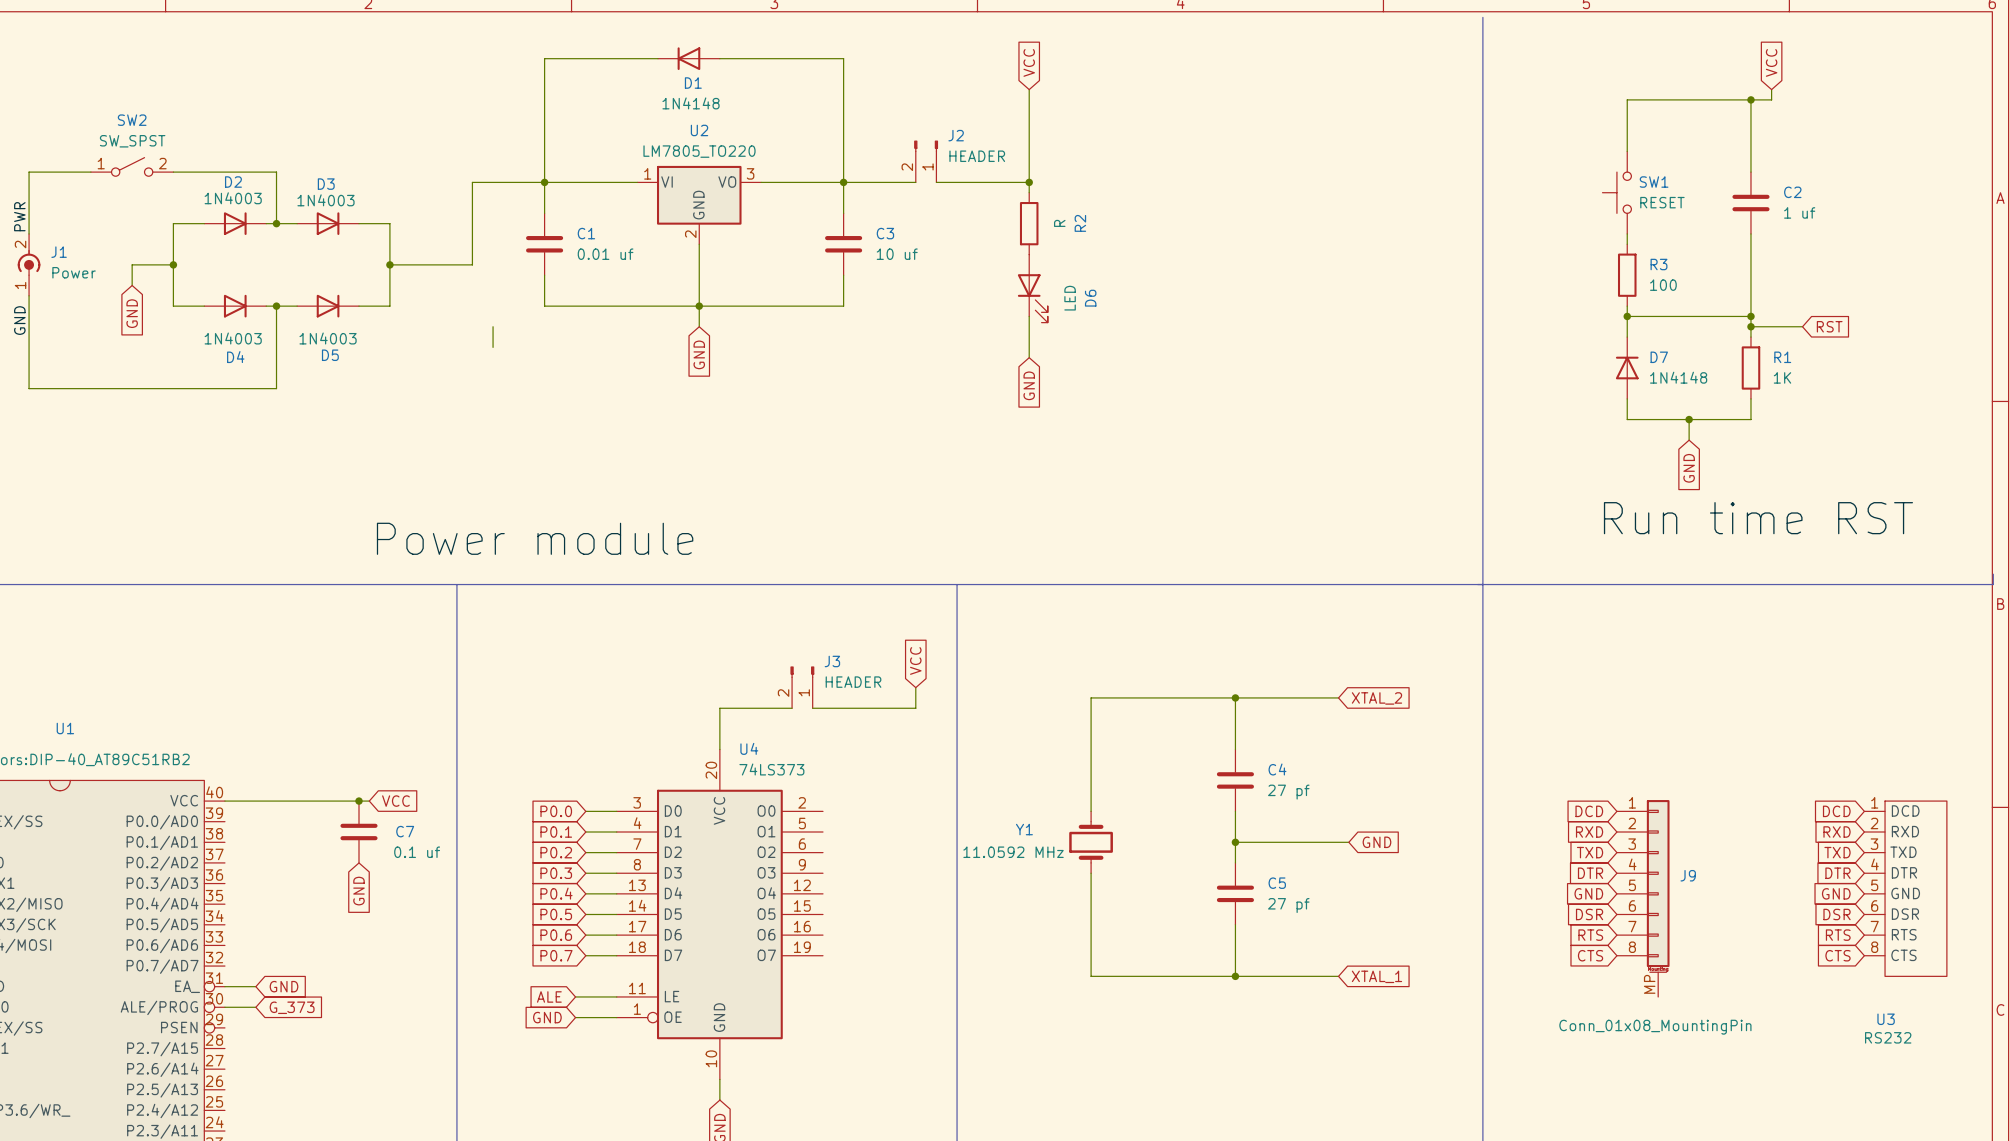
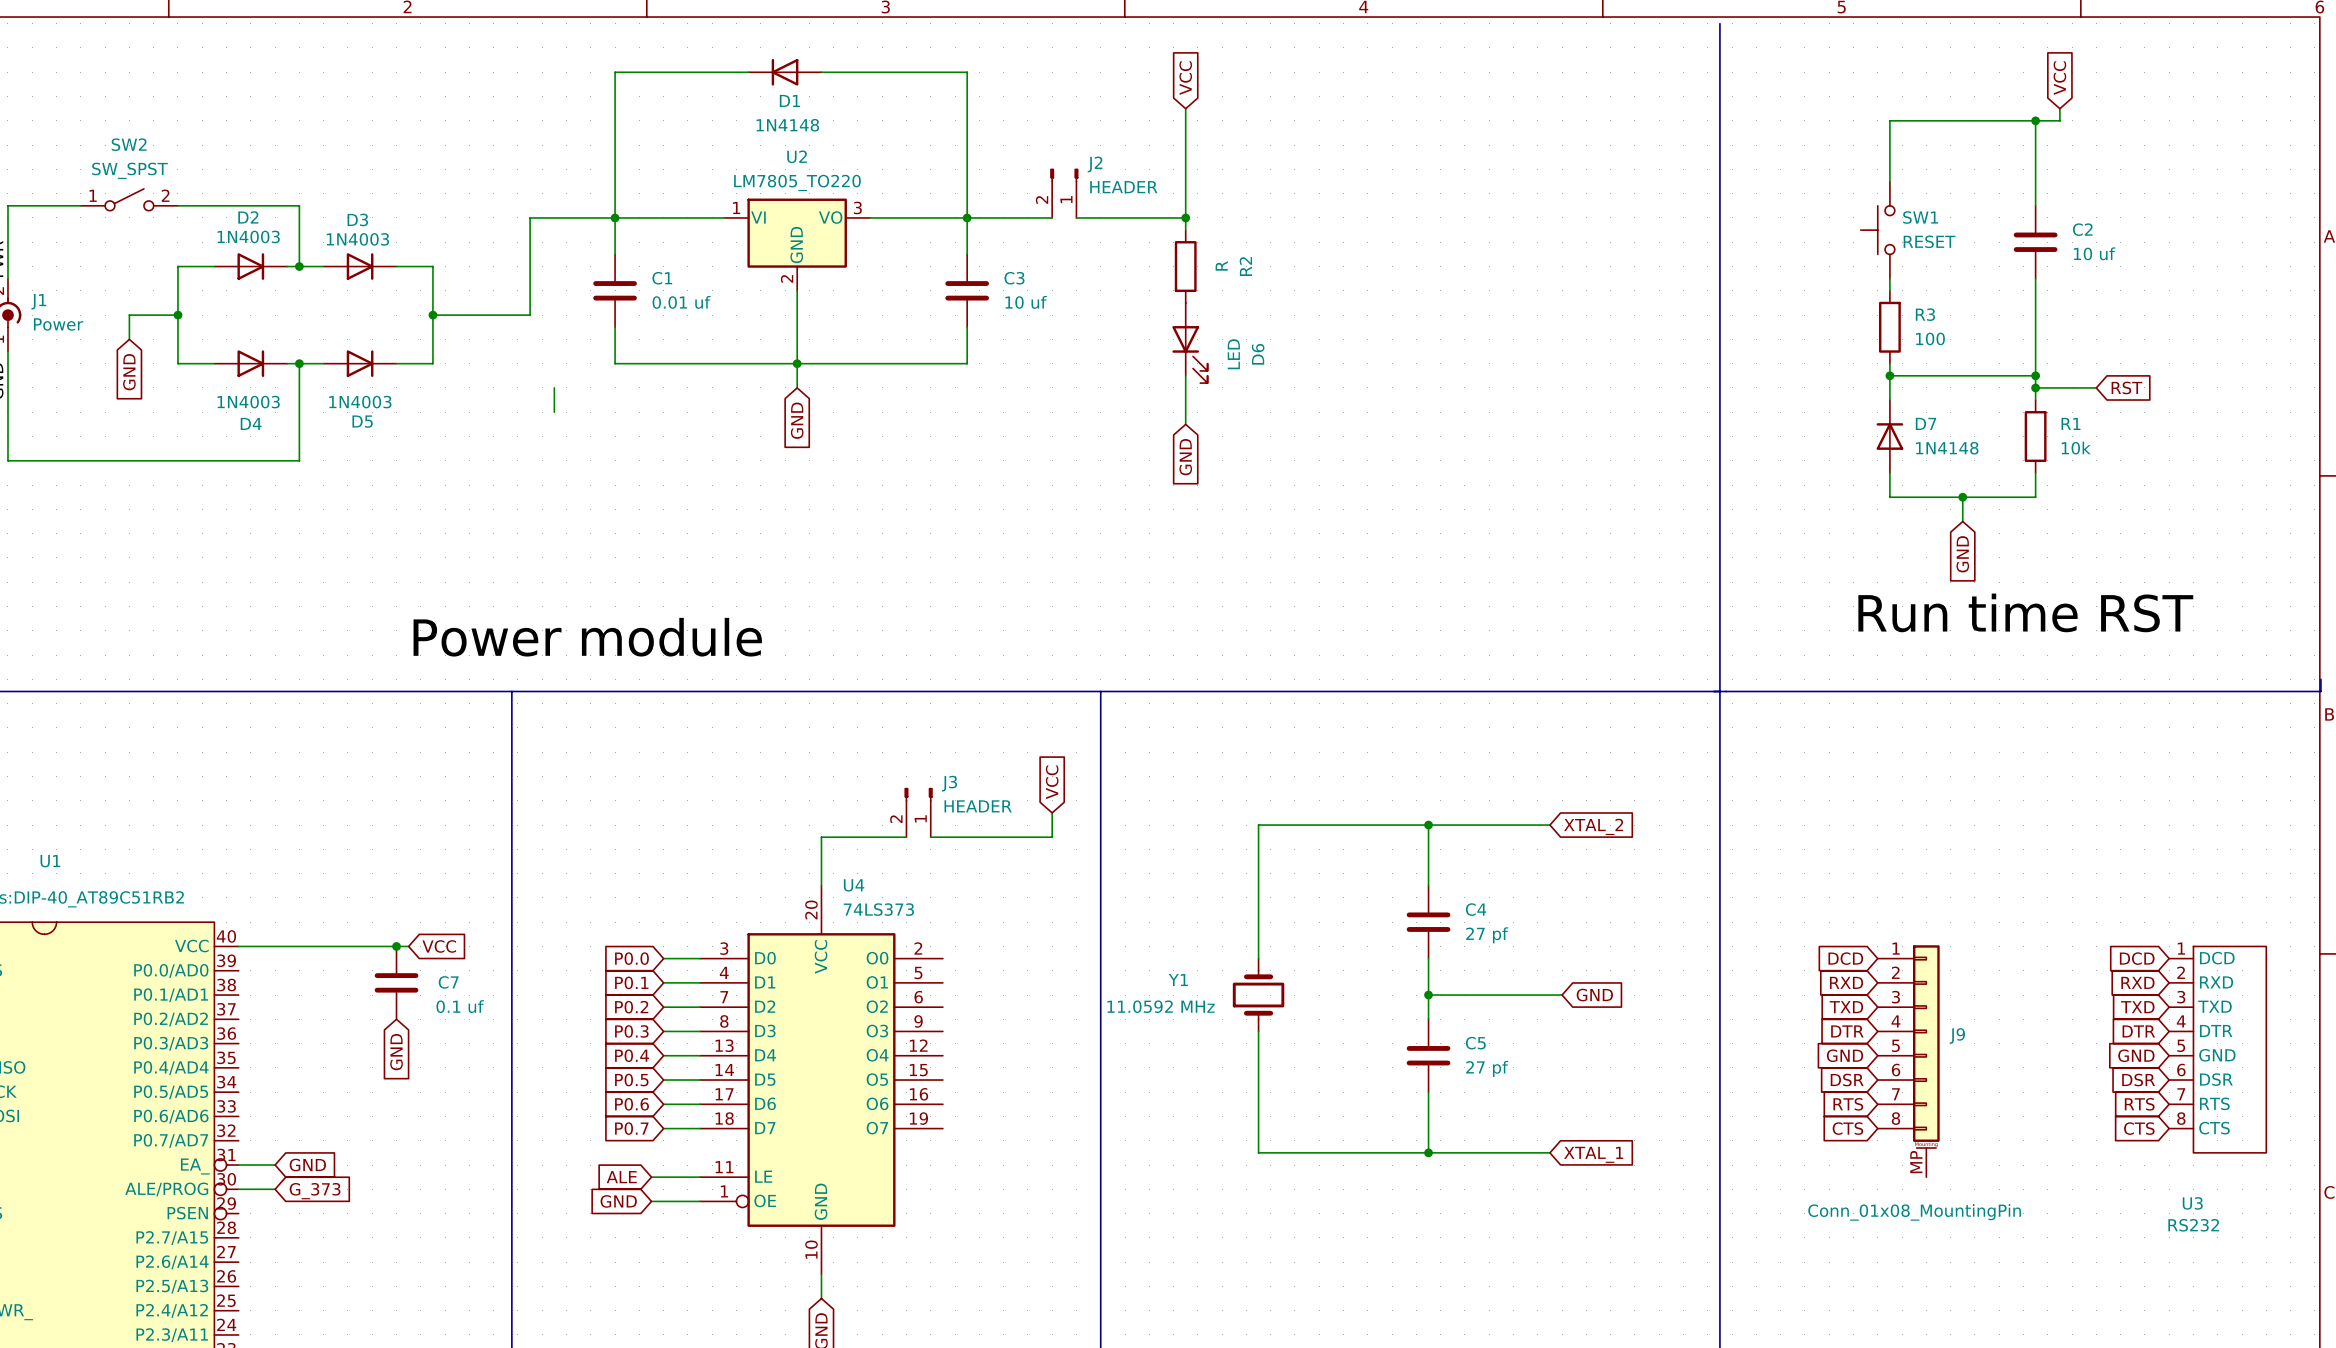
C2 value: 1 uf (1799, 212) -> 10 uf (2094, 253)
R1 value: 1K (1782, 377) -> 10k (2076, 448)

